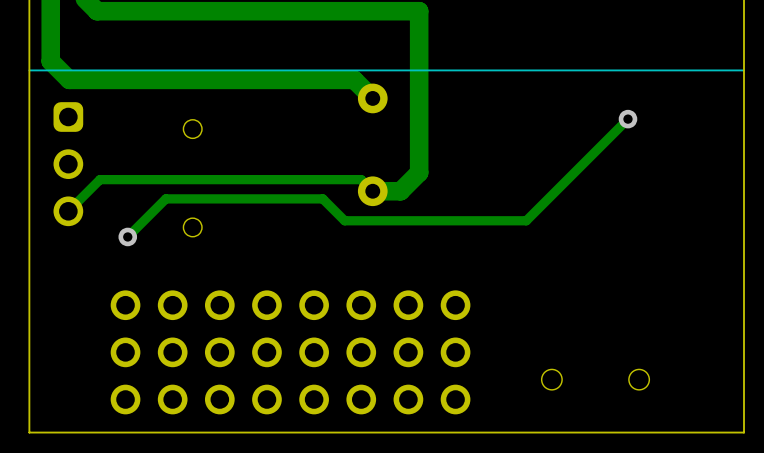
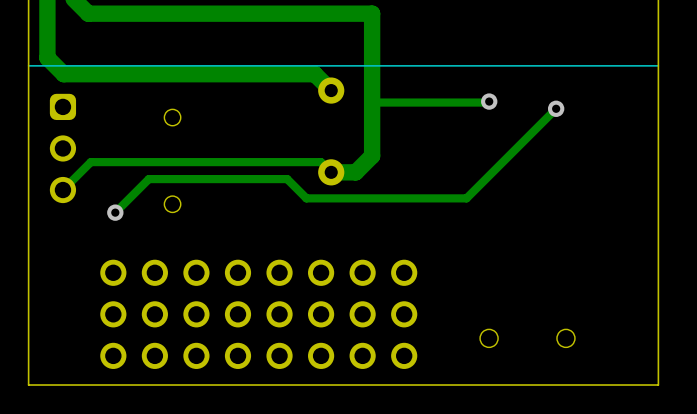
track: none -> (489, 101) (372, 102)
via: none -> (489, 101)

